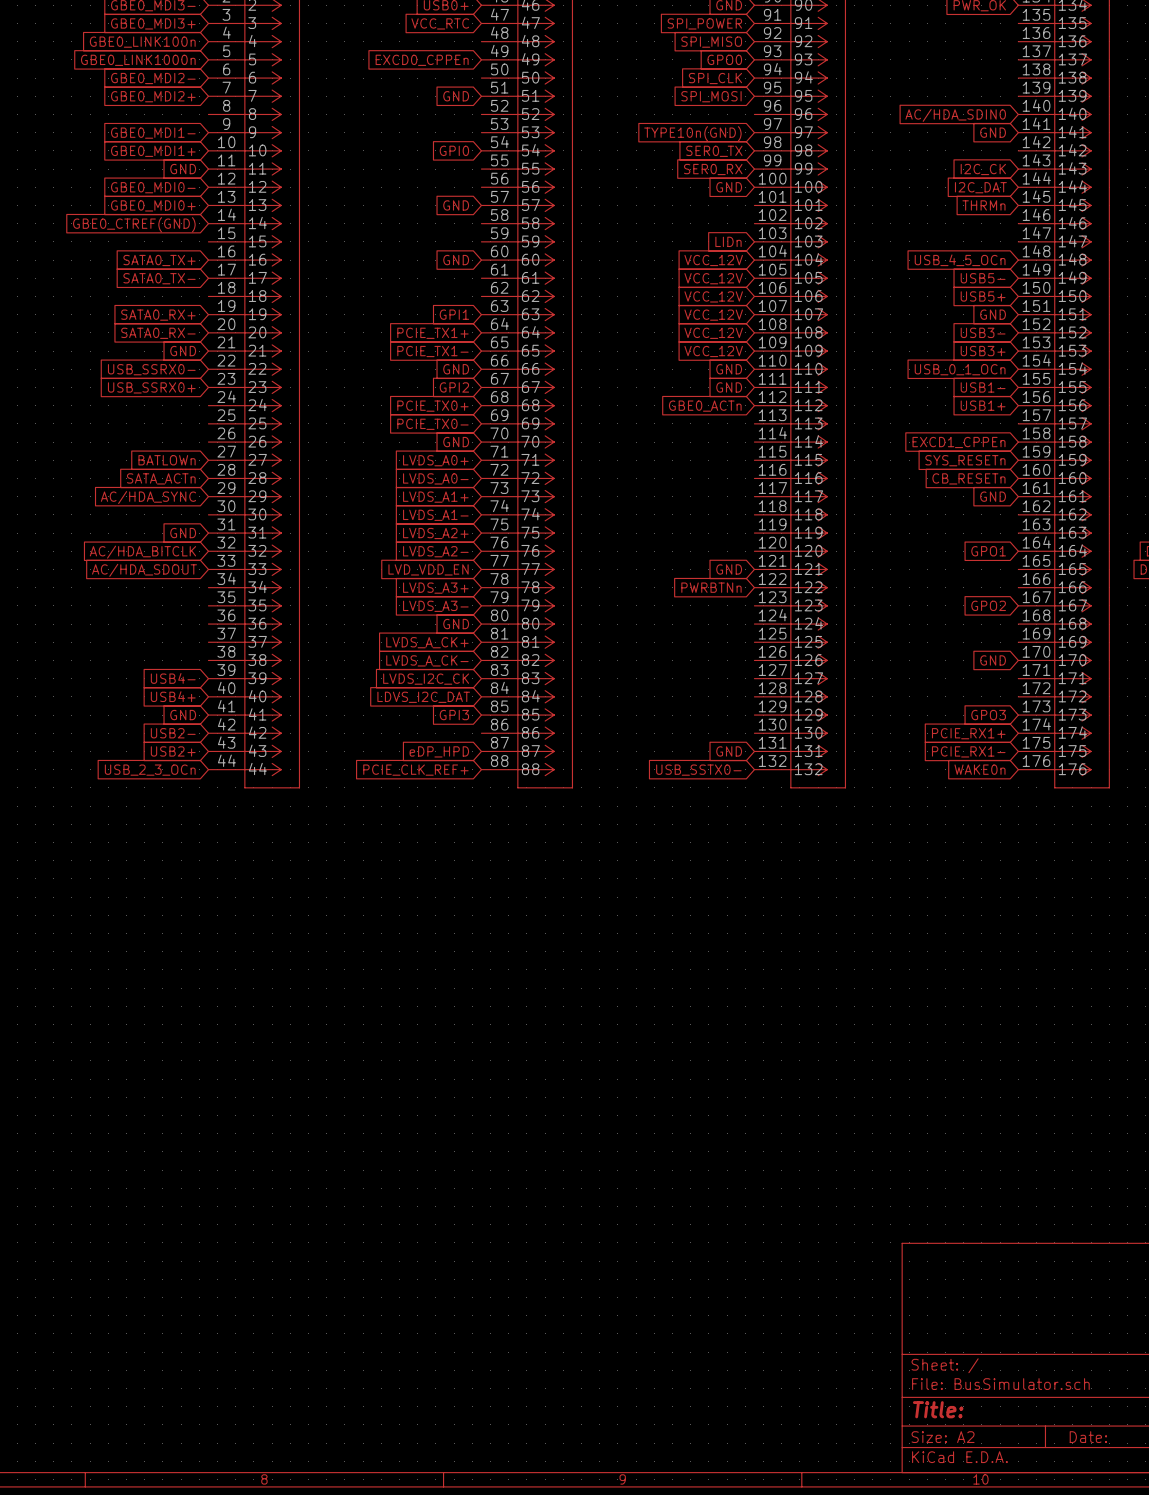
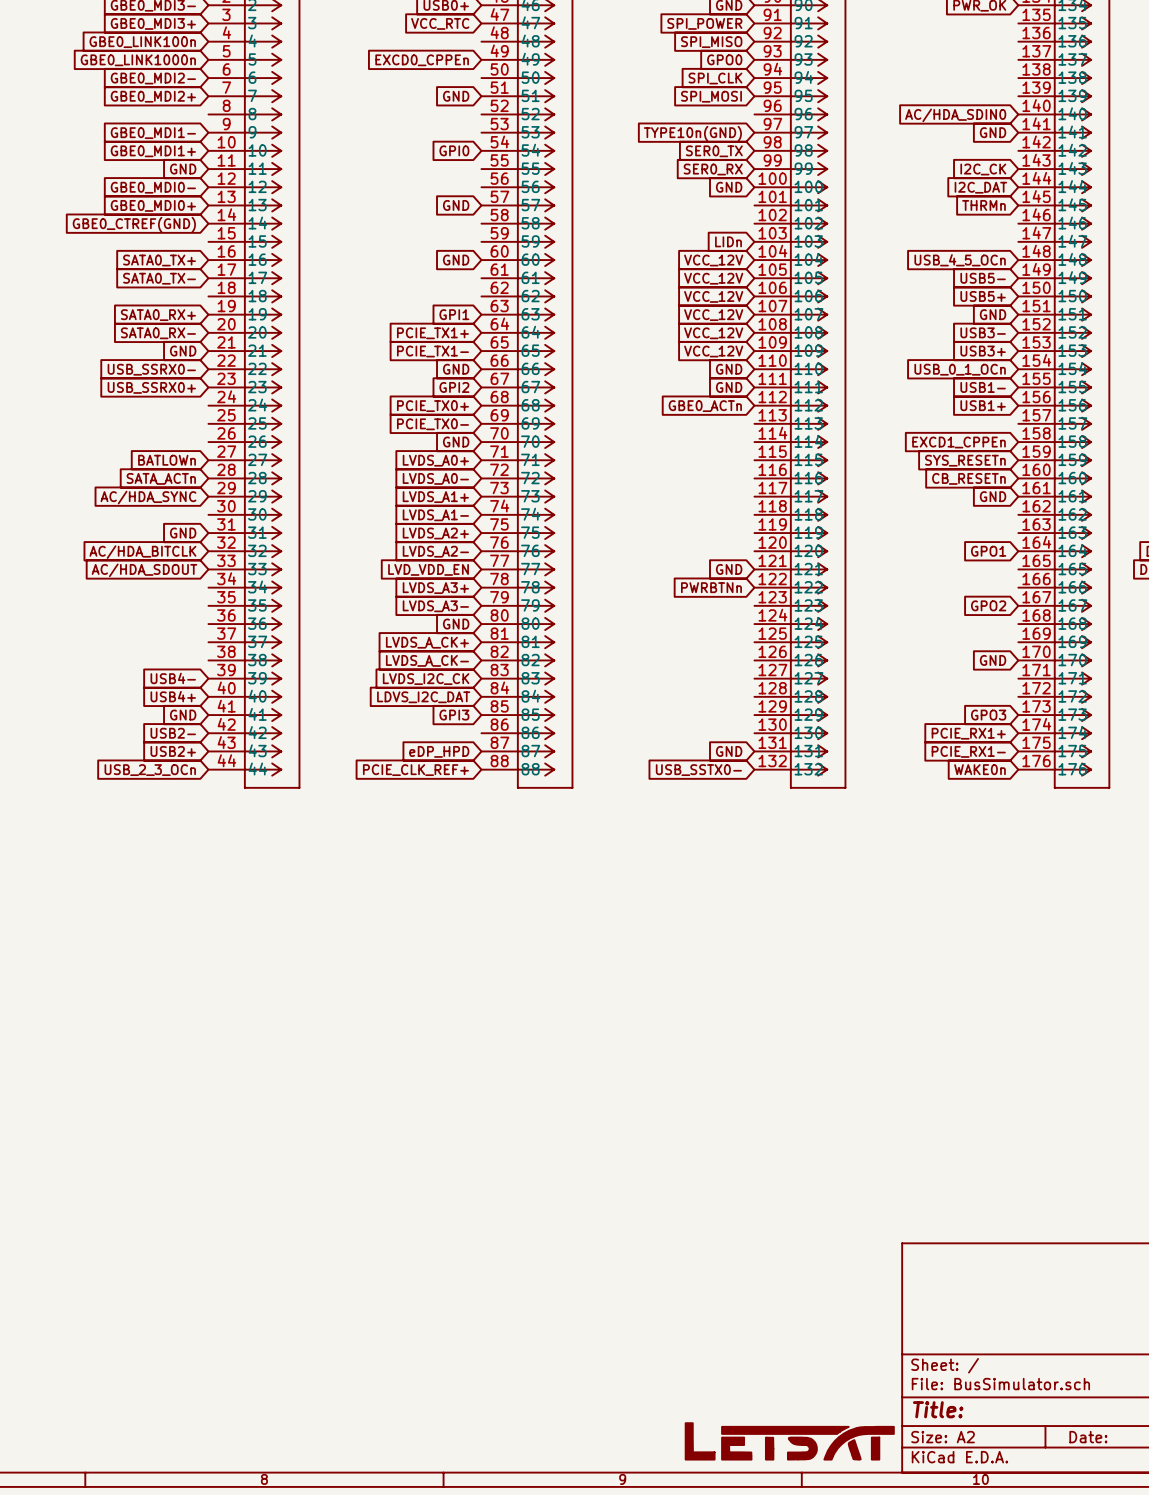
part: none -> (789, 1441)

